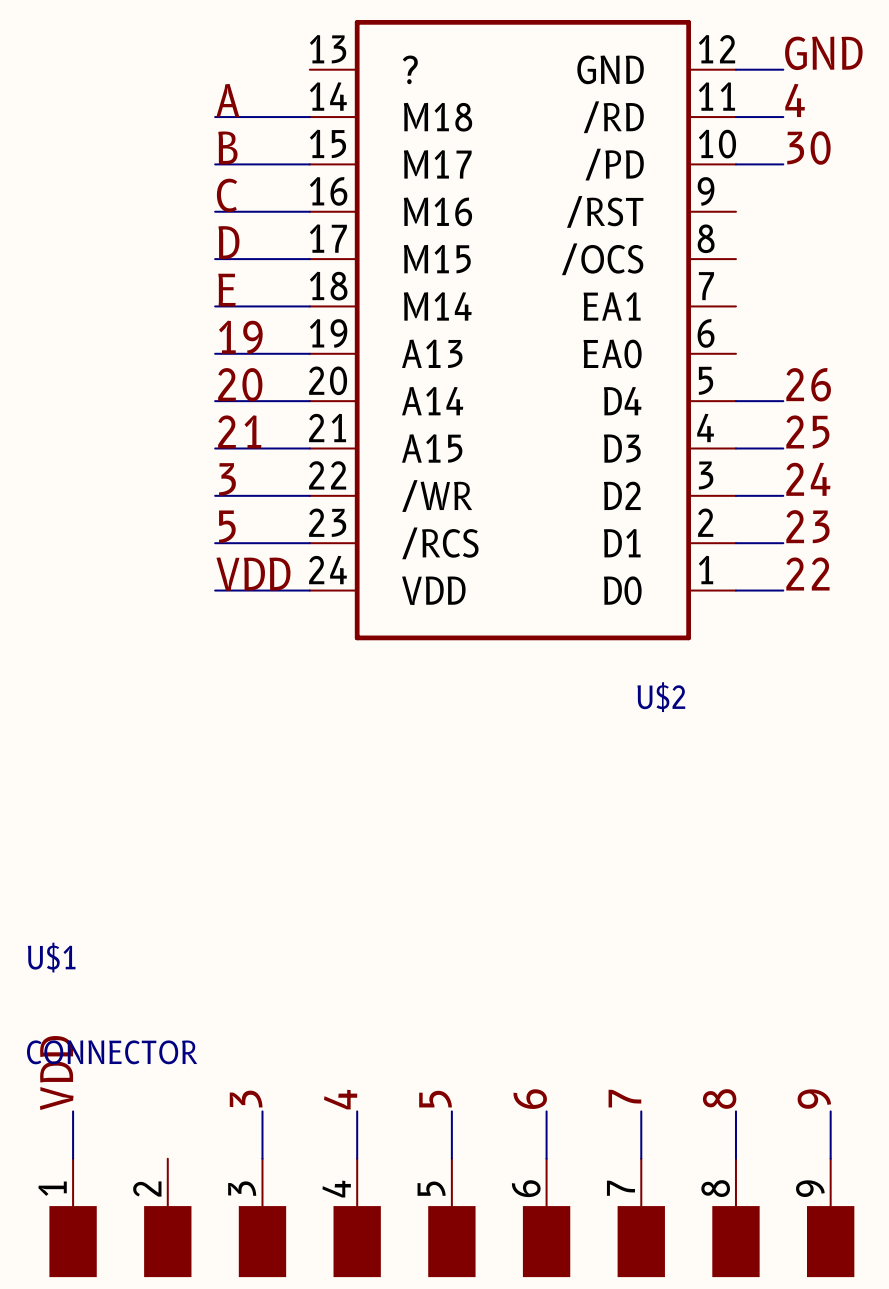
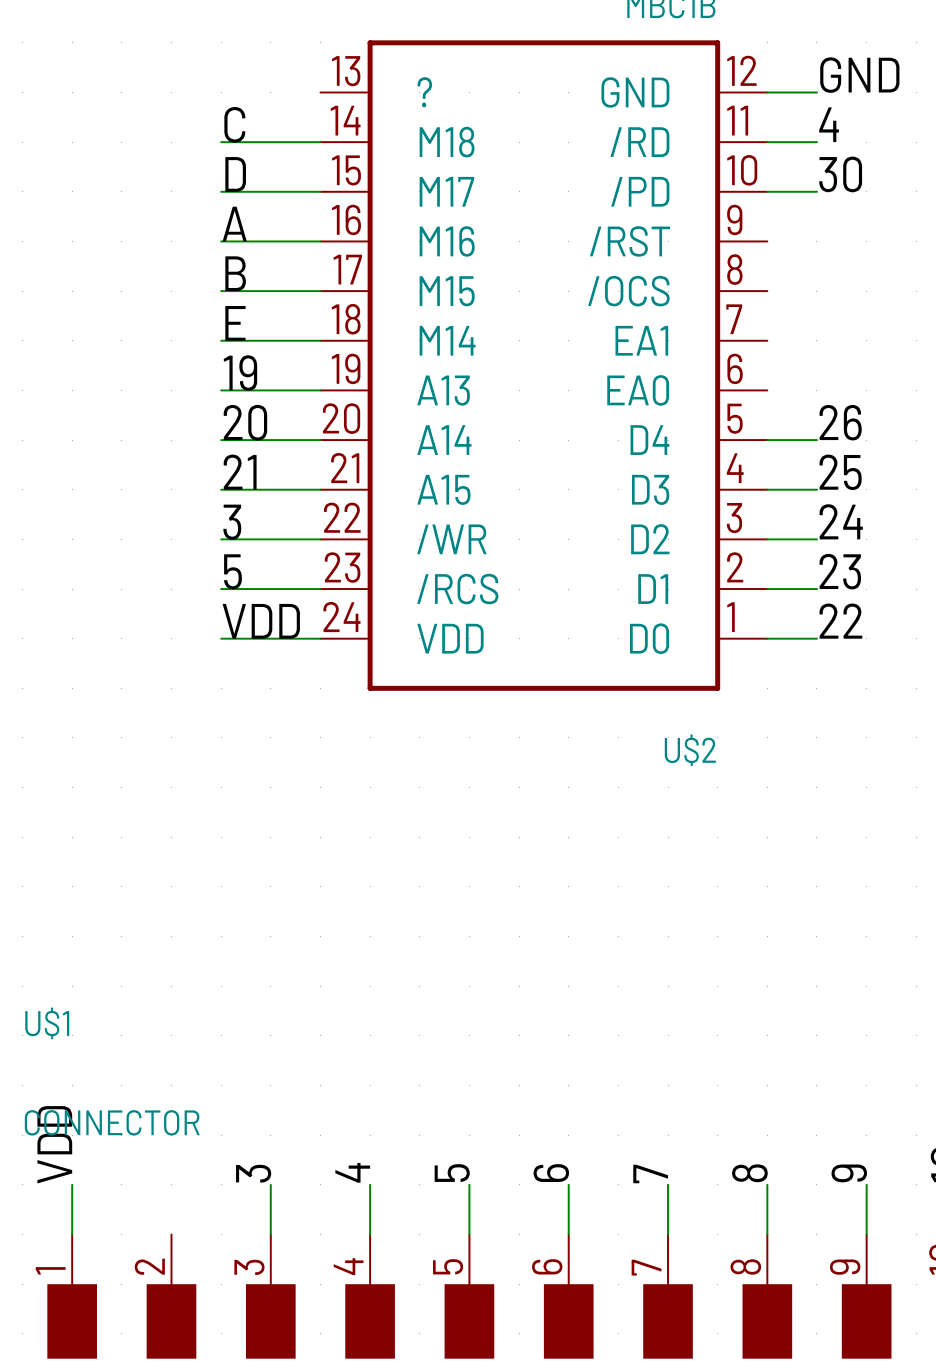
label: A (227, 100) -> C (234, 124)
label: B (227, 147) -> D (235, 174)
label: C (227, 195) -> A (234, 224)
label: D (228, 242) -> B (235, 273)

